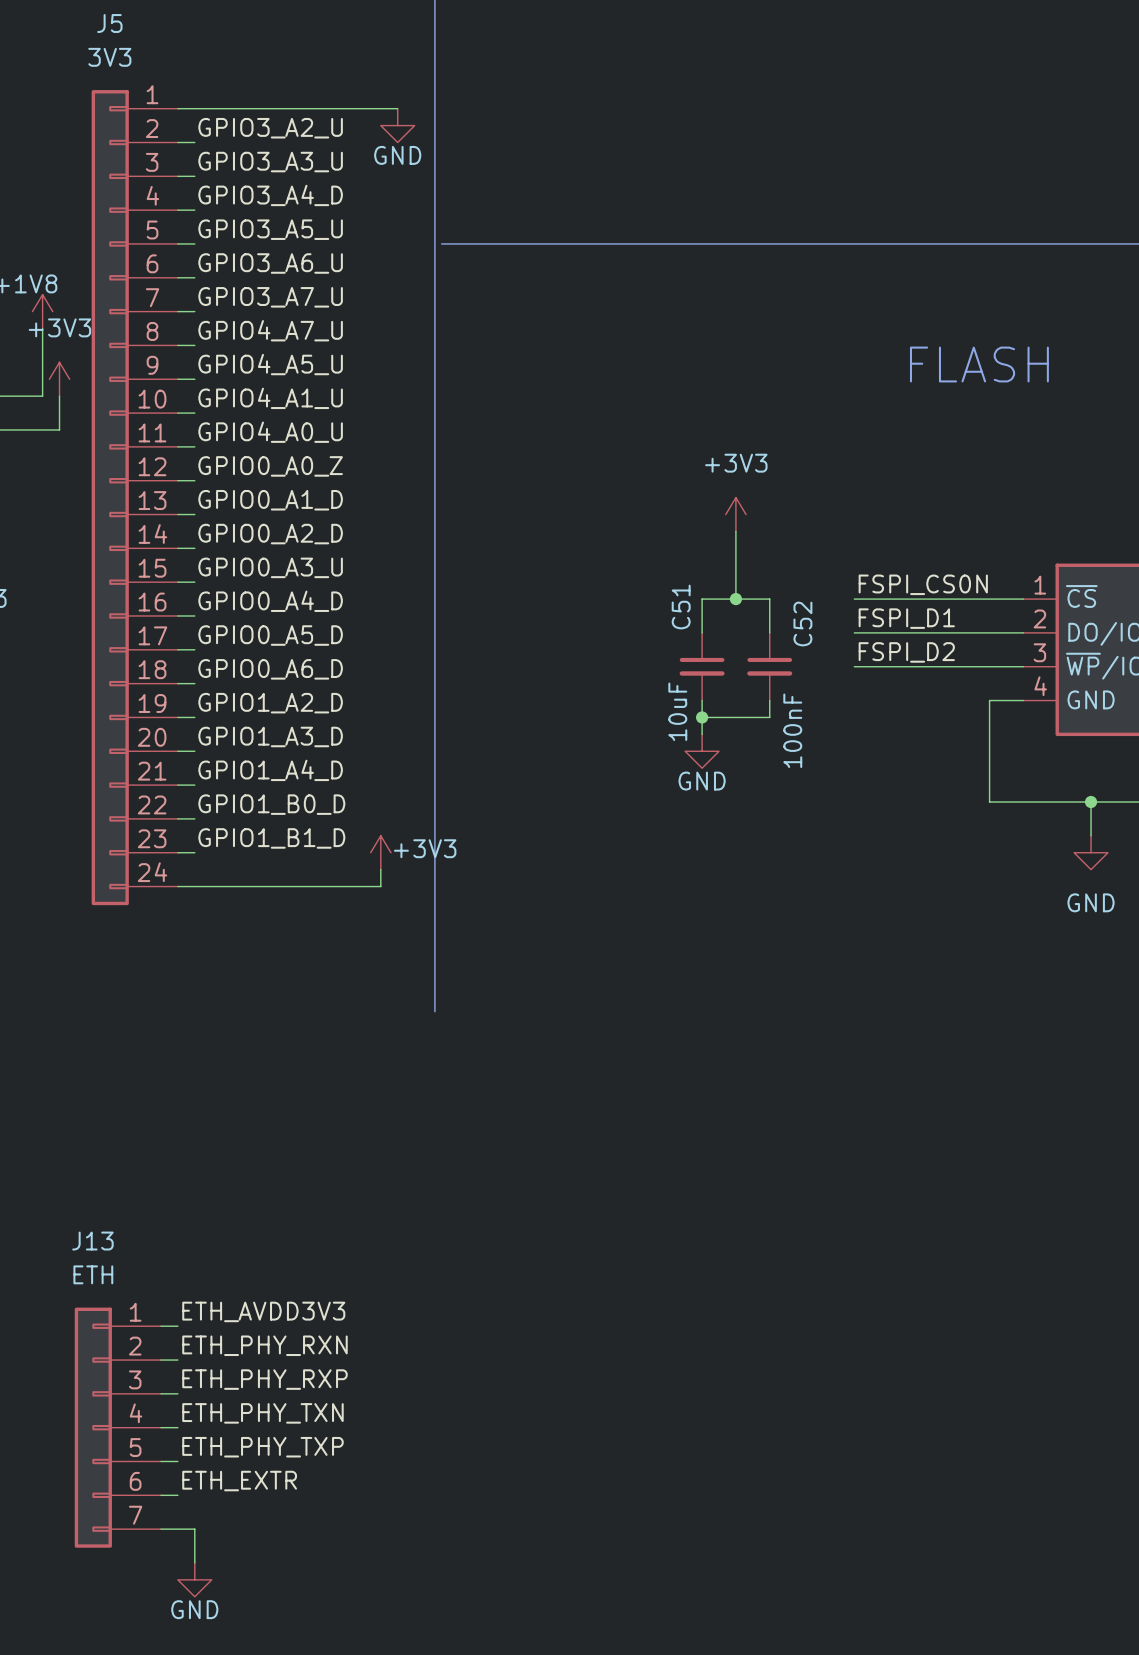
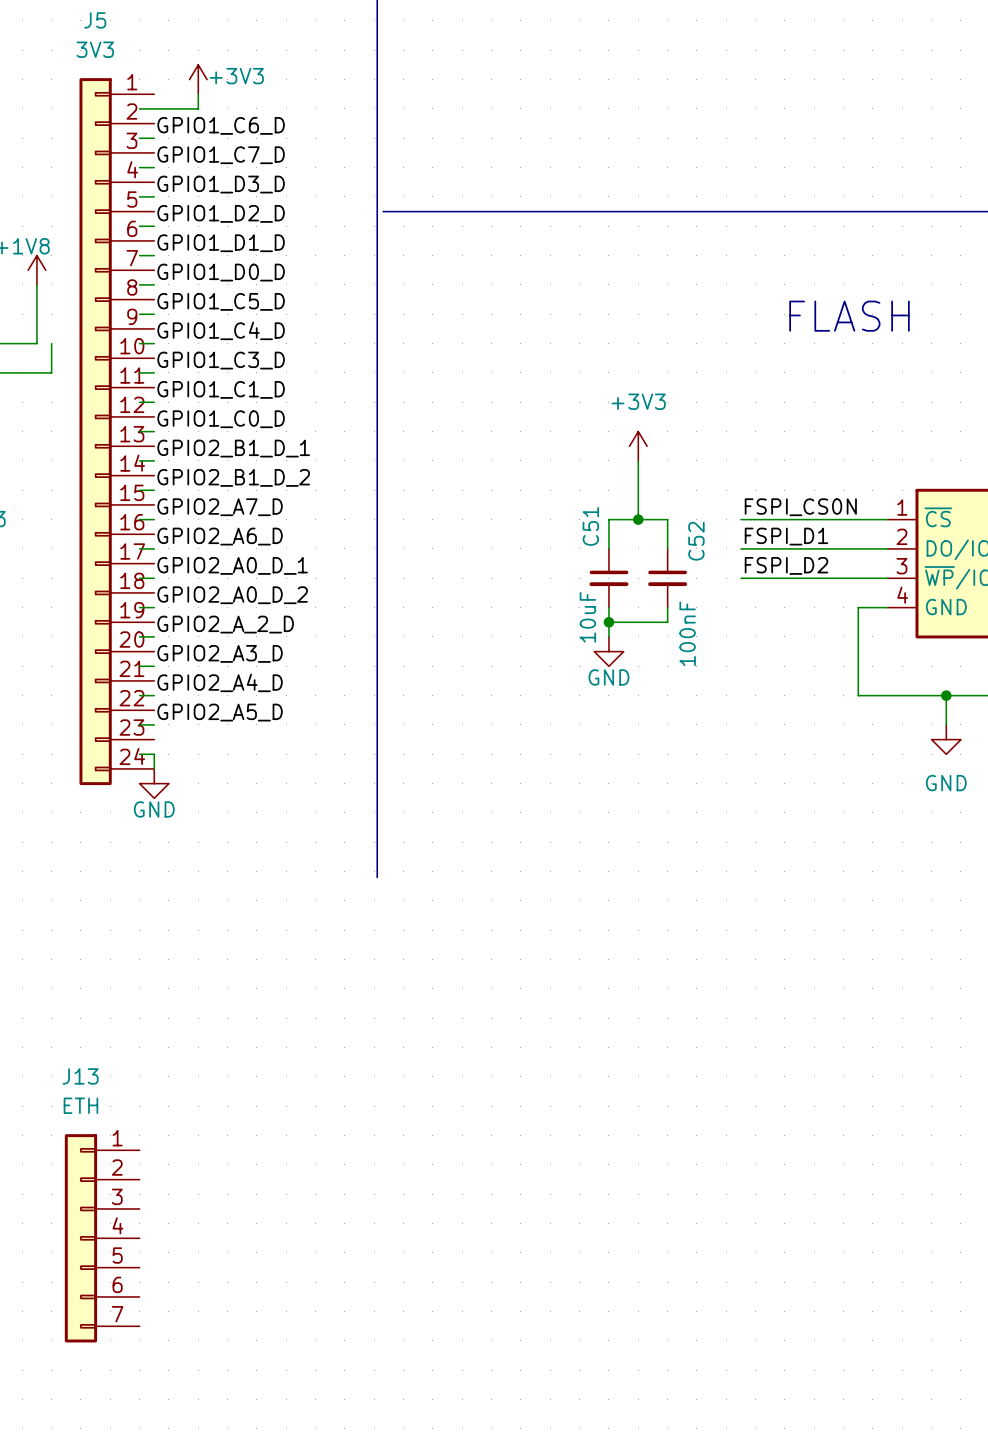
power symbol: none -> +3V3 (198, 79)
wire: (177, 108) (397, 108) -> none
wire: none -> (198, 94) (198, 108) (139, 108)
power symbol: GND (397, 125) -> none
label: GPIO3_A2_U (270, 128) -> none
wire: (177, 142) (194, 142) -> (139, 138) (154, 138)
label: none -> GPIO1_C6_D (221, 125)
label: GPIO3_A3_U (270, 162) -> none
wire: (177, 176) (194, 176) -> (139, 196) (154, 196)
label: none -> GPIO1_C7_D (221, 155)
label: GPIO3_A4_D (270, 195) -> none
wire: (177, 210) (194, 210) -> (139, 167) (154, 167)
label: none -> GPIO1_D3_D (221, 184)
label: GPIO3_A5_U (270, 229) -> none
wire: (177, 243) (194, 243) -> (139, 226) (154, 226)
label: none -> GPIO1_D2_D (221, 213)
label: GPIO3_A6_U (270, 263) -> none
wire: (177, 277) (194, 277) -> (139, 255) (154, 255)
label: none -> GPIO1_D1_D (221, 243)
label: GPIO3_A7_U (270, 297) -> none
wire: (177, 311) (194, 311) -> (139, 314) (154, 314)
label: none -> GPIO1_D0_D (221, 272)
label: GPIO4_A7_U (270, 330) -> none
wire: (177, 345) (194, 345) -> (139, 284) (154, 284)
label: GPIO4_A5_U (270, 364) -> GPIO1_C5_D (221, 301)
power symbol: +3V3 (59, 379) -> none
wire: (177, 379) (194, 379) -> (139, 343) (154, 343)
label: none -> GPIO1_C4_D (221, 330)
label: GPIO4_A1_U (270, 398) -> none
wire: (177, 413) (194, 413) -> (139, 402) (154, 402)
label: none -> GPIO1_C3_D (221, 360)
label: GPIO4_A0_U (270, 432) -> none
wire: (177, 446) (194, 446) -> (139, 372) (154, 372)
label: none -> GPIO1_C1_D (221, 389)
label: GPIO0_A0_Z (270, 466) -> none
wire: (177, 480) (194, 480) -> (139, 431) (154, 431)
label: none -> GPIO1_C0_D (221, 419)
label: GPIO0_A1_D (270, 500) -> none
wire: (177, 514) (194, 514) -> (139, 460) (154, 460)
label: none -> GPIO2_B1_D_1 (233, 448)
label: GPIO0_A2_D (270, 534) -> none
wire: (177, 548) (194, 548) -> (139, 578) (154, 578)
label: none -> GPIO2_B1_D_2 (233, 477)
label: GPIO0_A3_U (270, 567) -> none
wire: (177, 582) (194, 582) -> (139, 490) (154, 490)
label: none -> GPIO2_A7_D (220, 507)
label: GPIO0_A4_D (270, 601) -> none
wire: (177, 615) (194, 615) -> (139, 519) (154, 519)
label: none -> GPIO2_A6_D (220, 536)
label: GPIO0_A5_D (270, 635) -> none
wire: (177, 649) (194, 649) -> (139, 548) (154, 548)
label: none -> GPIO2_A0_D_1 (232, 565)
label: GPIO0_A6_D (270, 669) -> none
wire: (177, 683) (194, 683) -> (139, 607) (154, 607)
label: none -> GPIO2_A0_D_2 (232, 595)
label: GPIO1_A2_D (270, 703) -> none
wire: (177, 717) (194, 717) -> (139, 666) (154, 666)
label: none -> GPIO2_A_2_D (225, 624)
label: GPIO1_A3_D (270, 736) -> none
wire: (177, 751) (194, 751) -> (139, 636) (154, 636)
label: none -> GPIO2_A3_D (220, 653)
label: GPIO1_A4_D (270, 770) -> none
wire: (177, 785) (194, 785) -> (139, 695) (154, 695)
label: none -> GPIO2_A4_D (220, 682)
label: GPIO1_B0_D (271, 804) -> none
wire: (177, 818) (194, 818) -> (139, 724) (154, 724)
label: none -> GPIO2_A5_D (220, 712)
label: GPIO1_B1_D (271, 838) -> none
wire: (177, 852) (194, 852) -> none
power symbol: +3V3 (380, 852) -> none
wire: (380, 869) (380, 886) (177, 886) -> (139, 754) (154, 754) (154, 768)
power symbol: none -> GND (154, 783)
label: ETH_AVDD3V3 (263, 1311) -> none
wire: (160, 1326) (177, 1326) -> none
label: ETH_PHY_RXN (264, 1345) -> none
wire: (160, 1360) (177, 1360) -> none
label: ETH_PHY_RXP (264, 1379) -> none
wire: (160, 1393) (177, 1393) -> none
label: ETH_PHY_TXN (262, 1413) -> none
wire: (160, 1427) (177, 1427) -> none
label: ETH_PHY_TXP (262, 1447) -> none
wire: (160, 1461) (177, 1461) -> none
label: ETH_EXTR (239, 1481) -> none
wire: (160, 1495) (177, 1495) -> none
wire: (160, 1529) (194, 1529) (194, 1562) -> none
power symbol: GND (194, 1579) -> none

